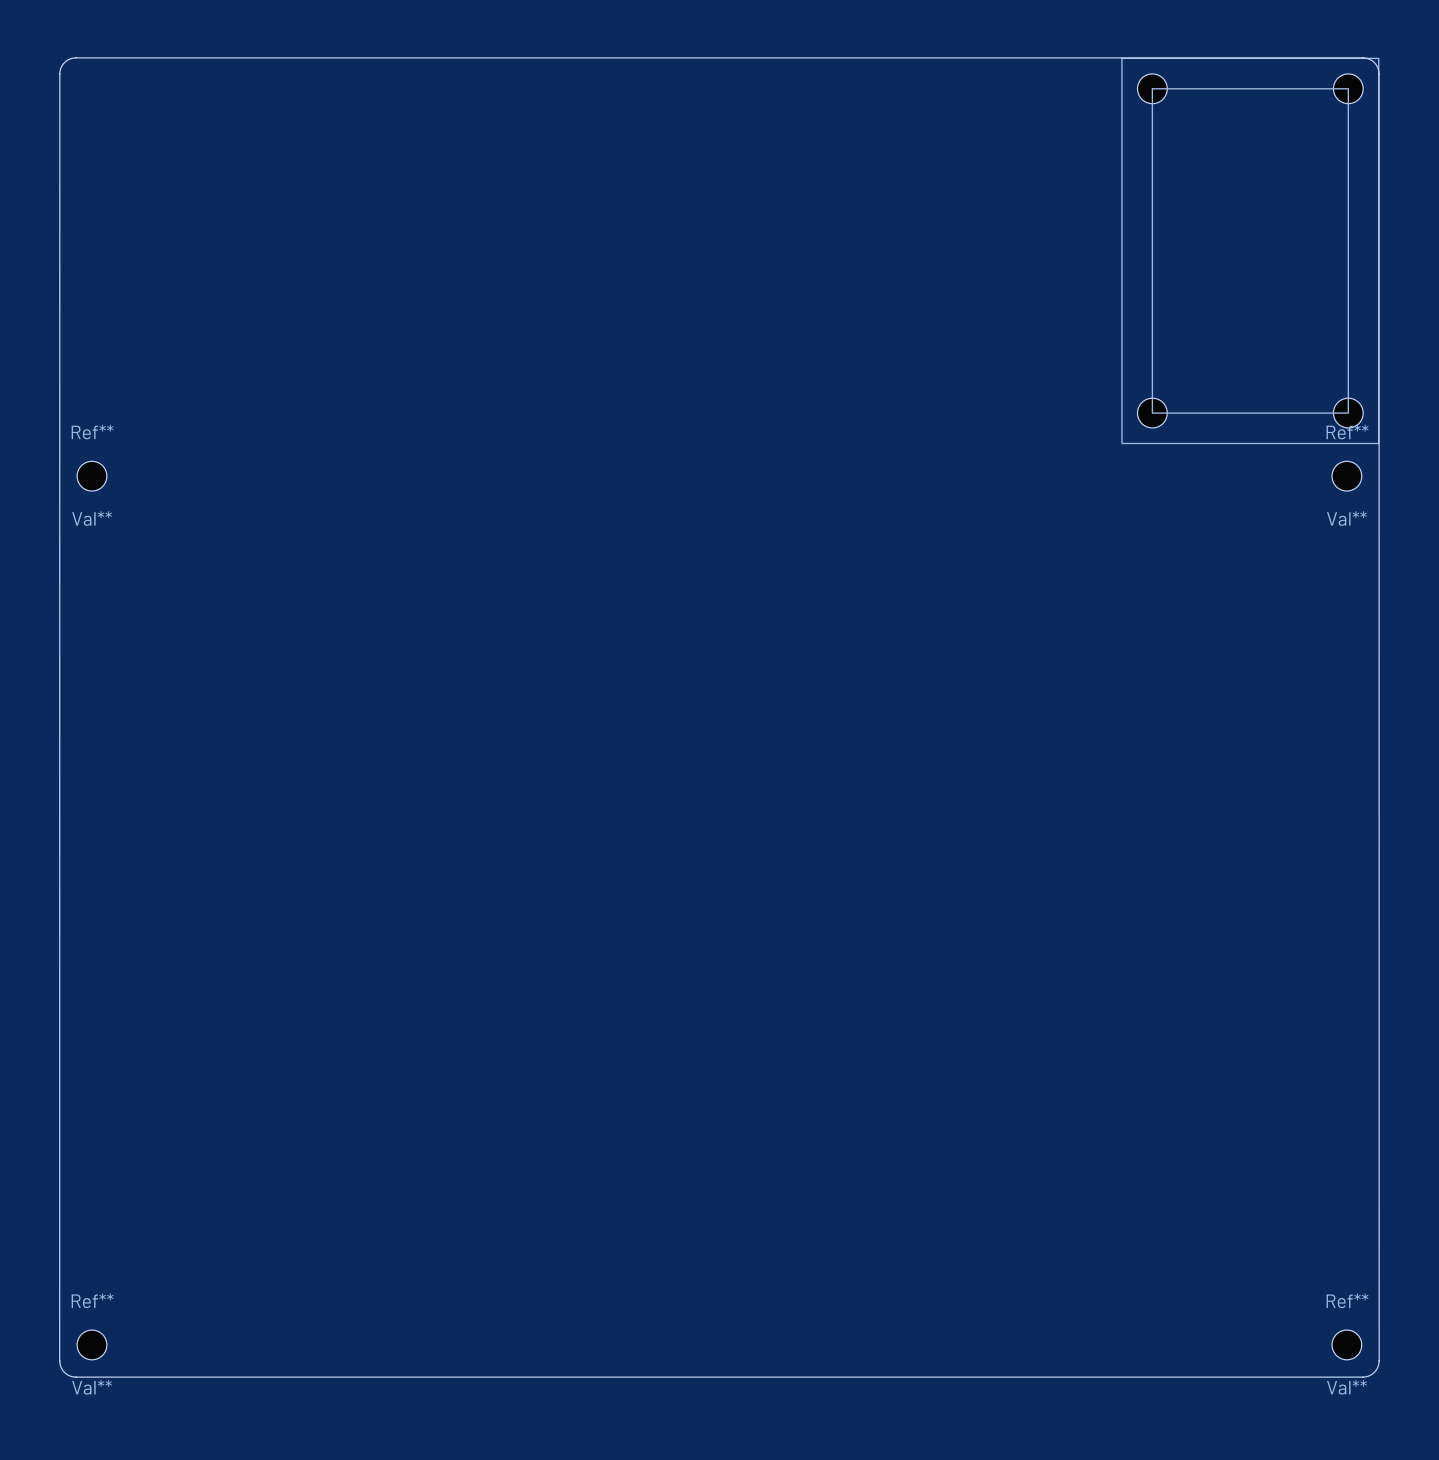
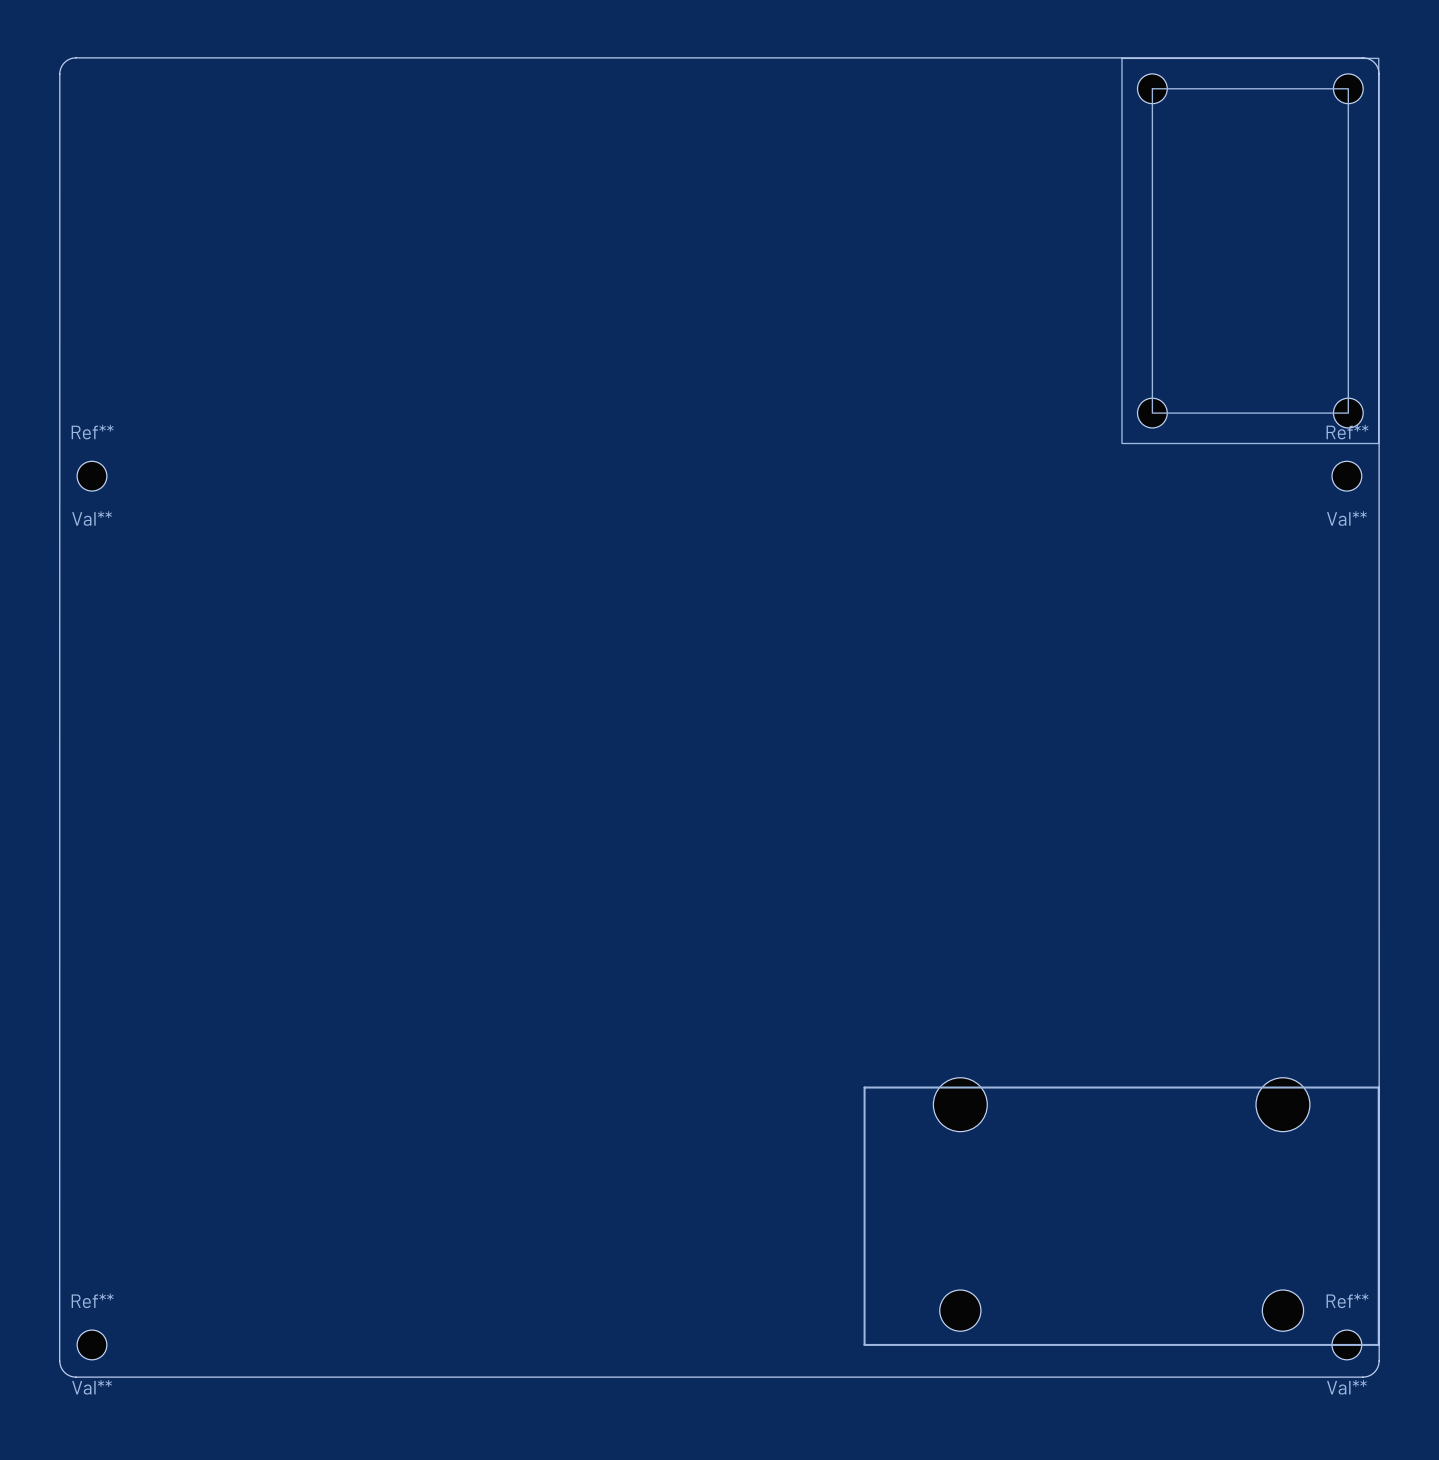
part: none -> (1121, 1211)

